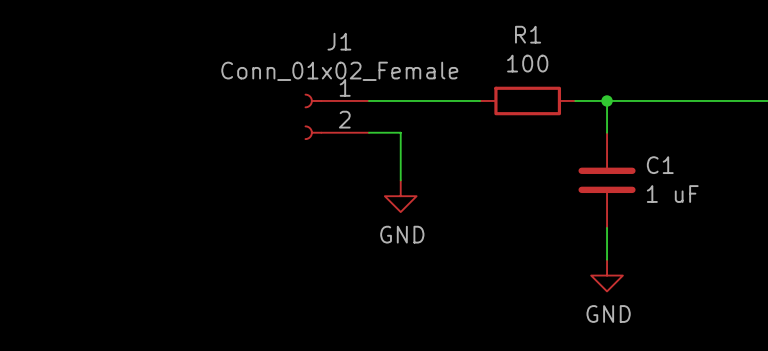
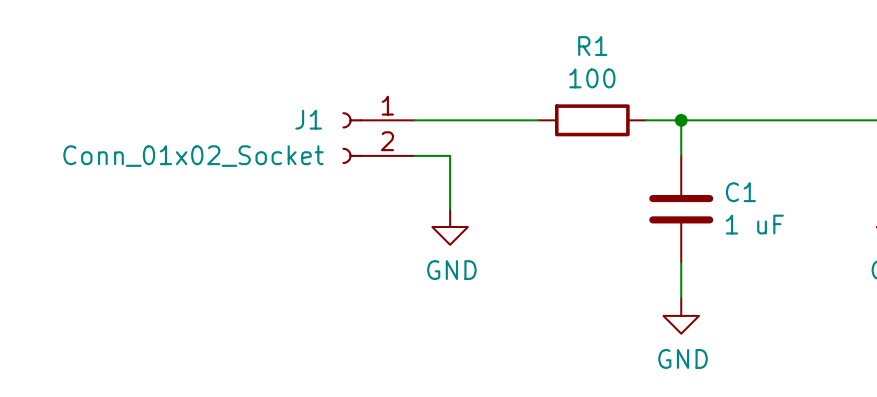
J1 name position: J1 (339, 41) -> J1 (308, 119)
J1 value: Conn_01x02_Female (339, 71) -> Conn_01x02_Socket (193, 156)

